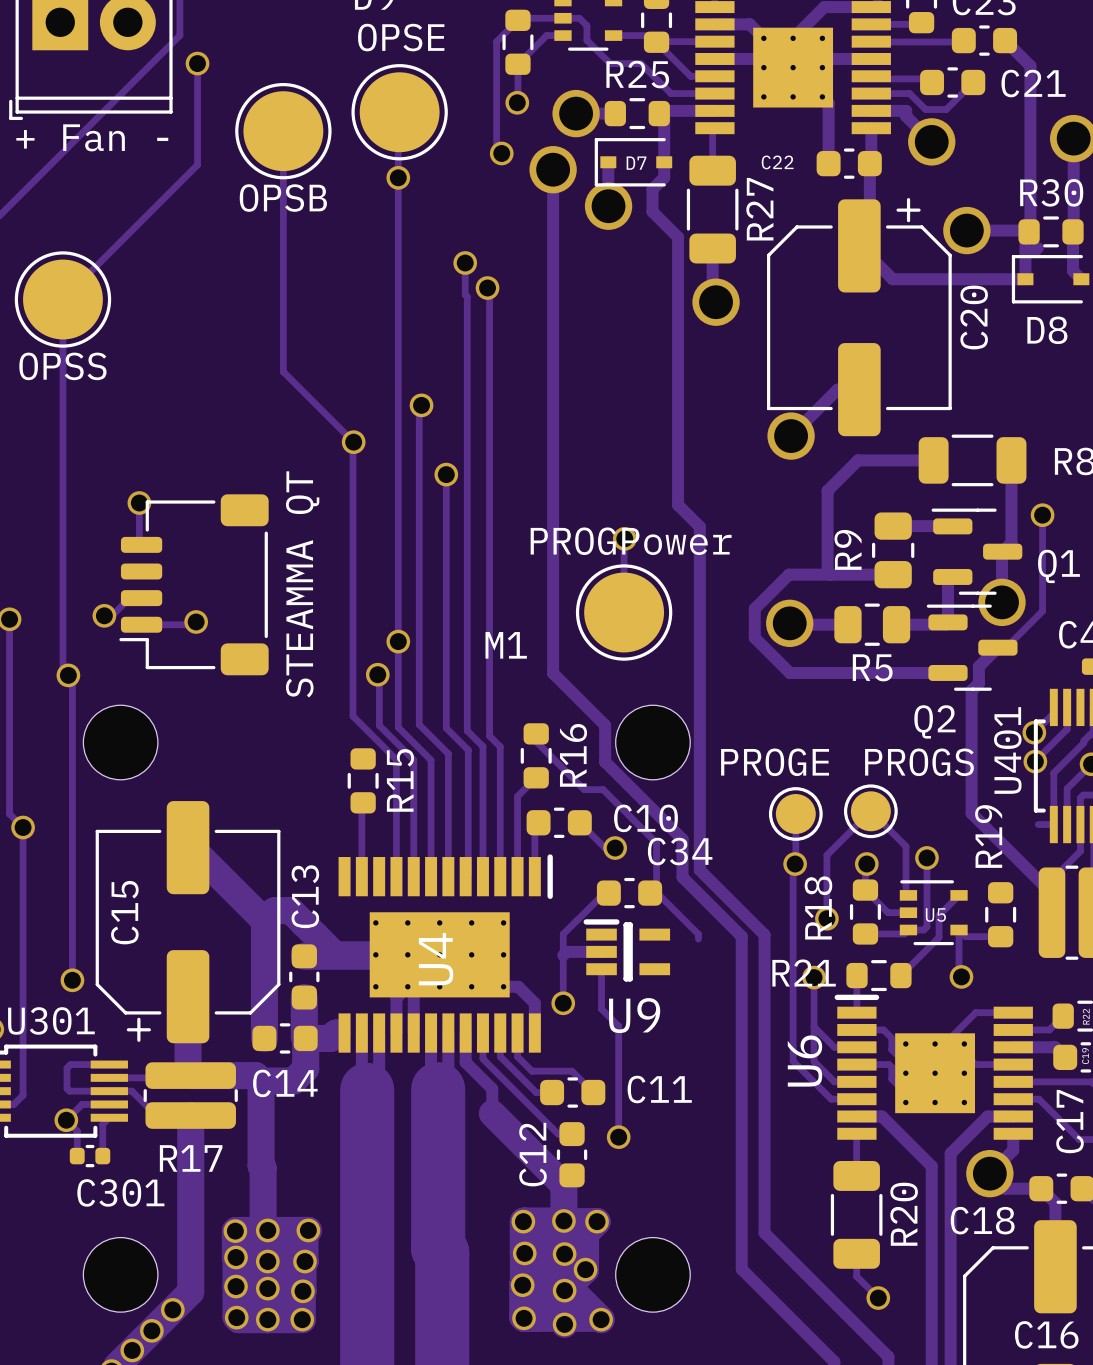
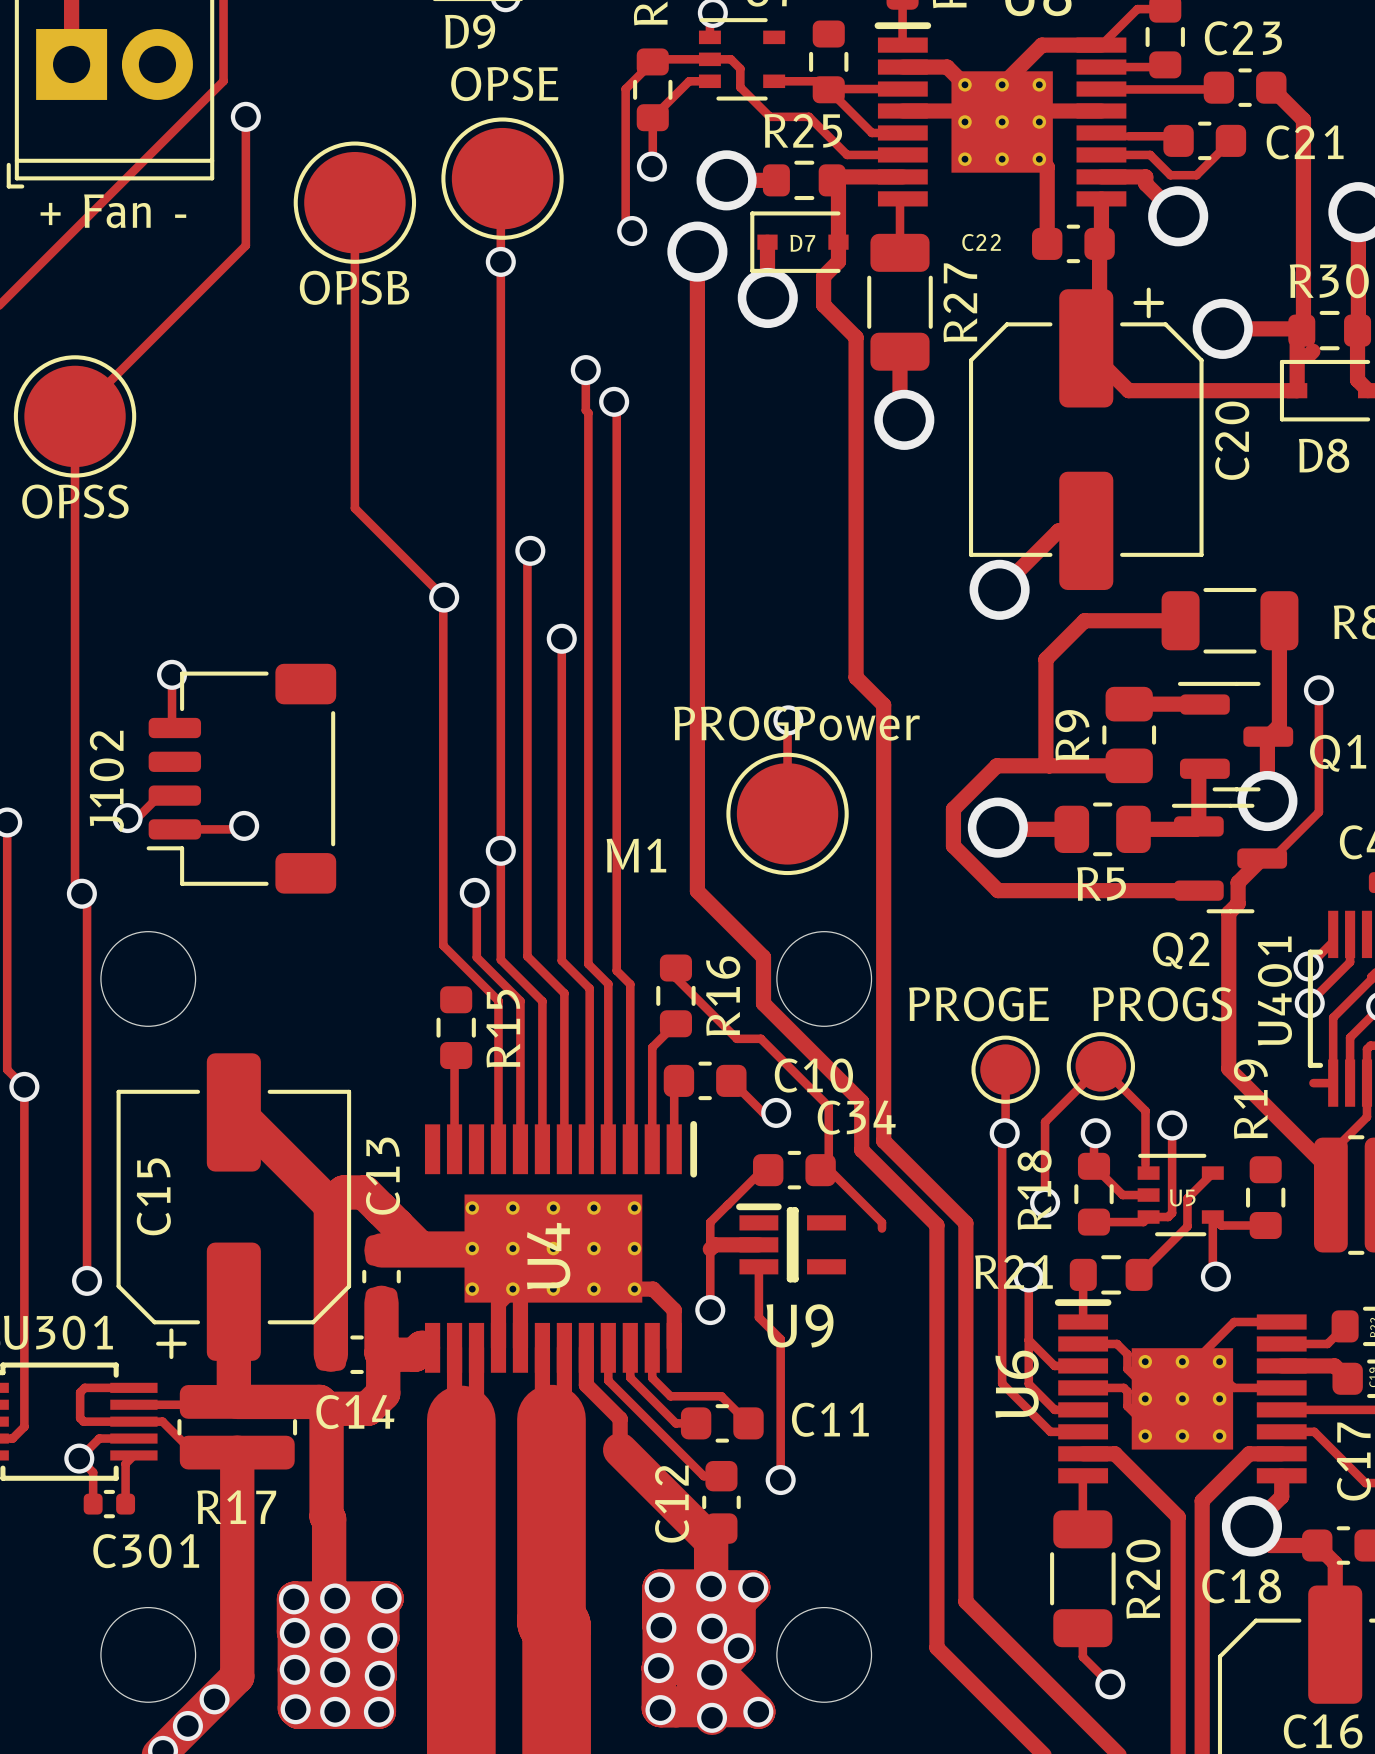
J102 name: none -> J102 (106, 781)
J102 value: STEAMMA QT (302, 584) -> none

